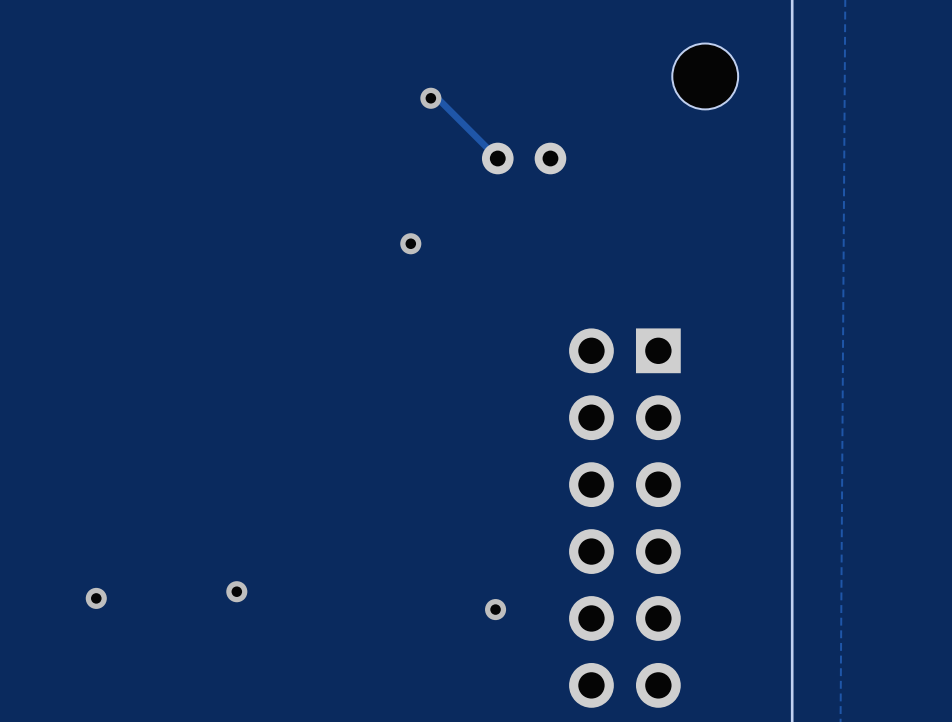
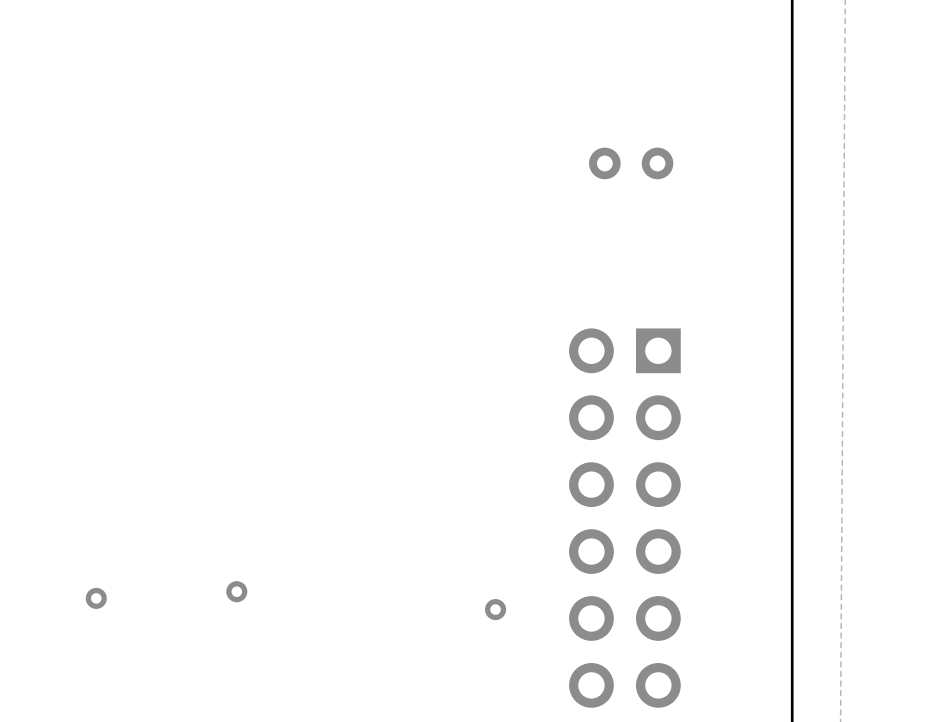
part: (705, 76) -> none
track: (430, 98) (437, 98) (497, 158) -> none
via: (430, 98) -> none
part position: (524, 158) -> (631, 163)
via: (410, 243) -> none

